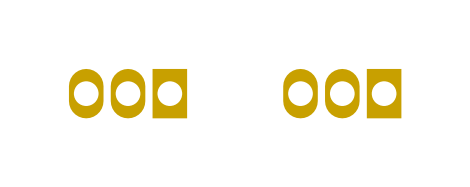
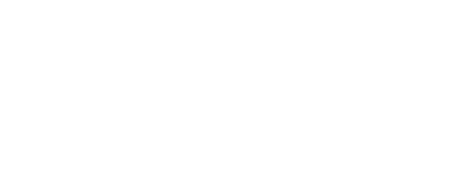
part: (128, 93) -> none
part: (342, 93) -> none

